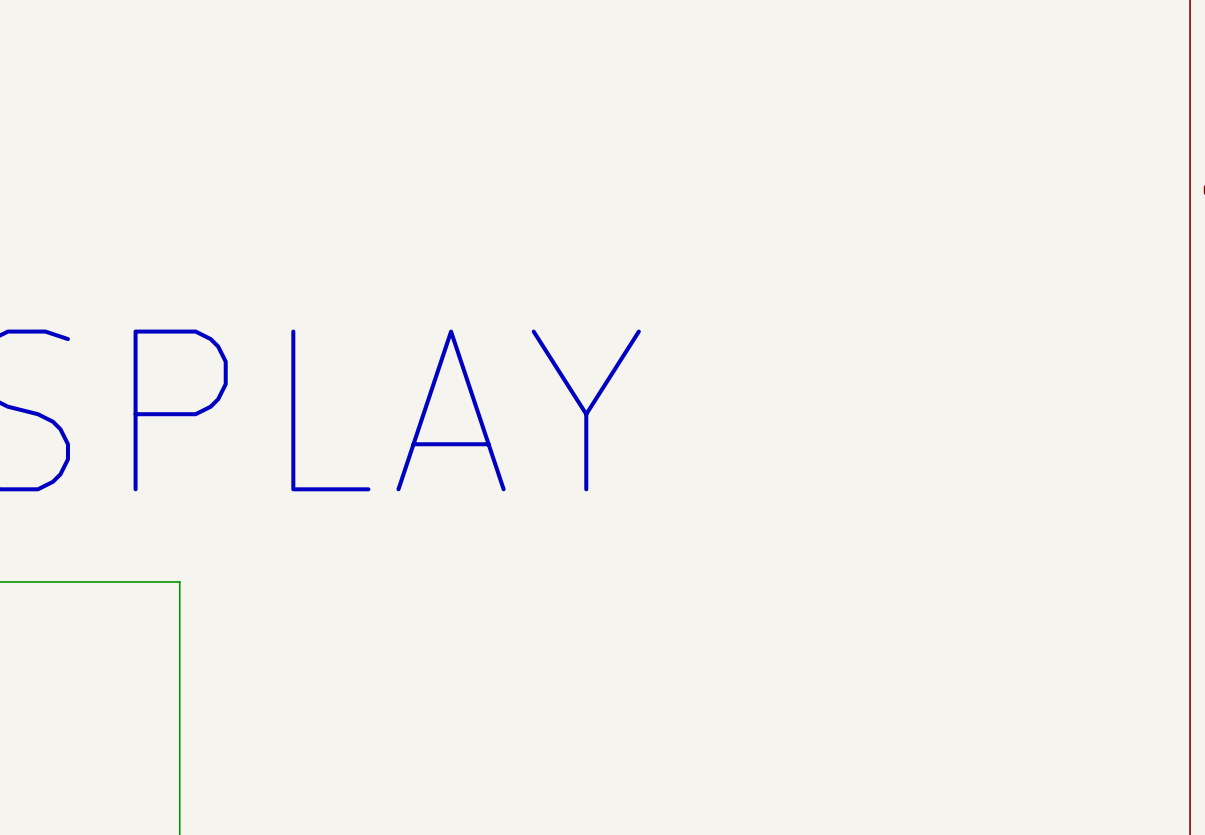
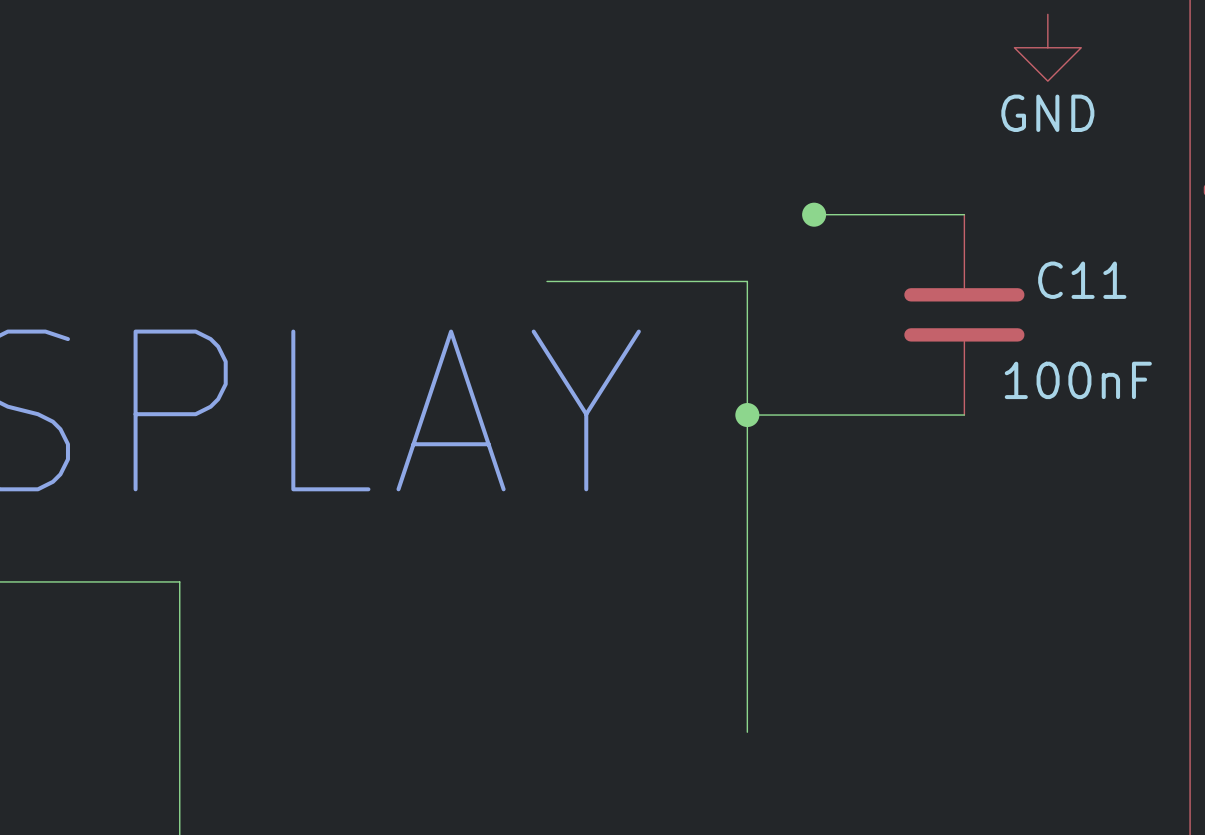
power symbol: none -> GND (1047, 47)
wire: none -> (814, 214) (964, 214)
junction: none -> (814, 214)
wire: none -> (547, 281) (747, 281) (747, 732)
C11: none -> 100nF (964, 314)
wire: none -> (747, 415) (964, 415)
junction: none -> (747, 415)

